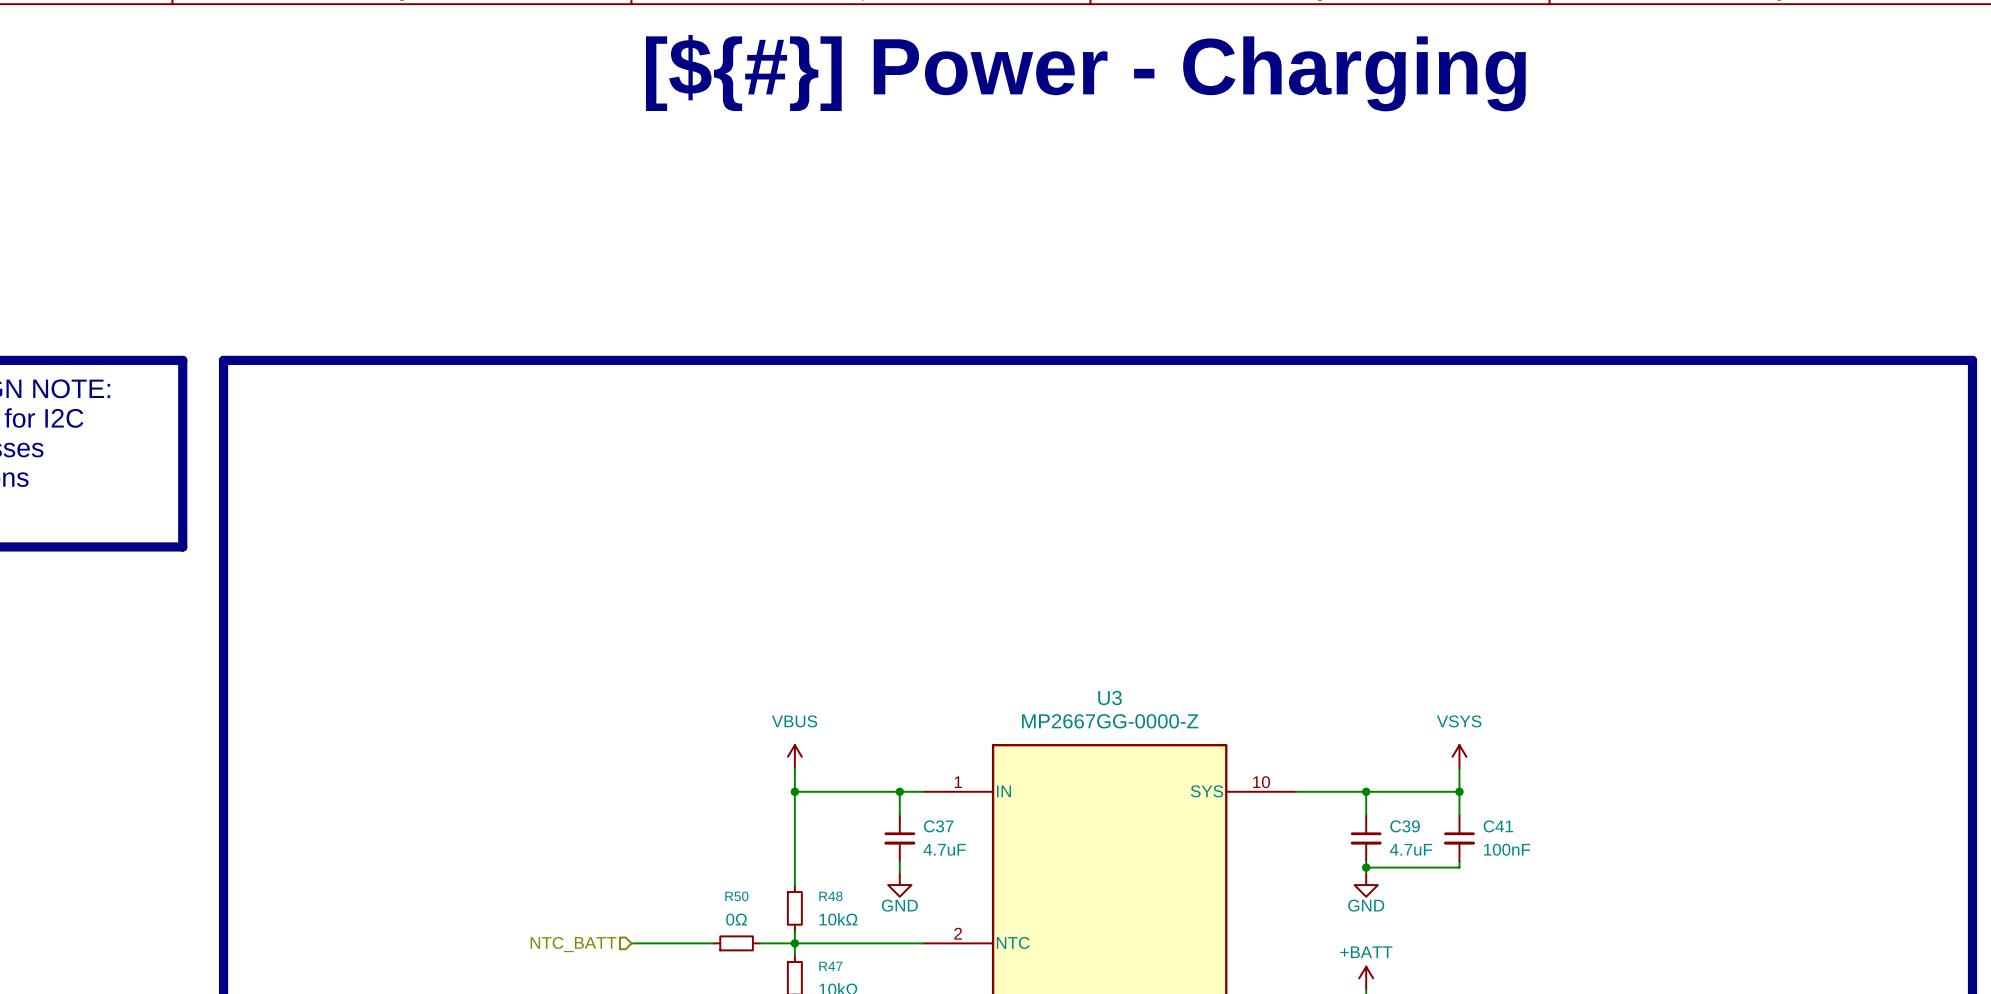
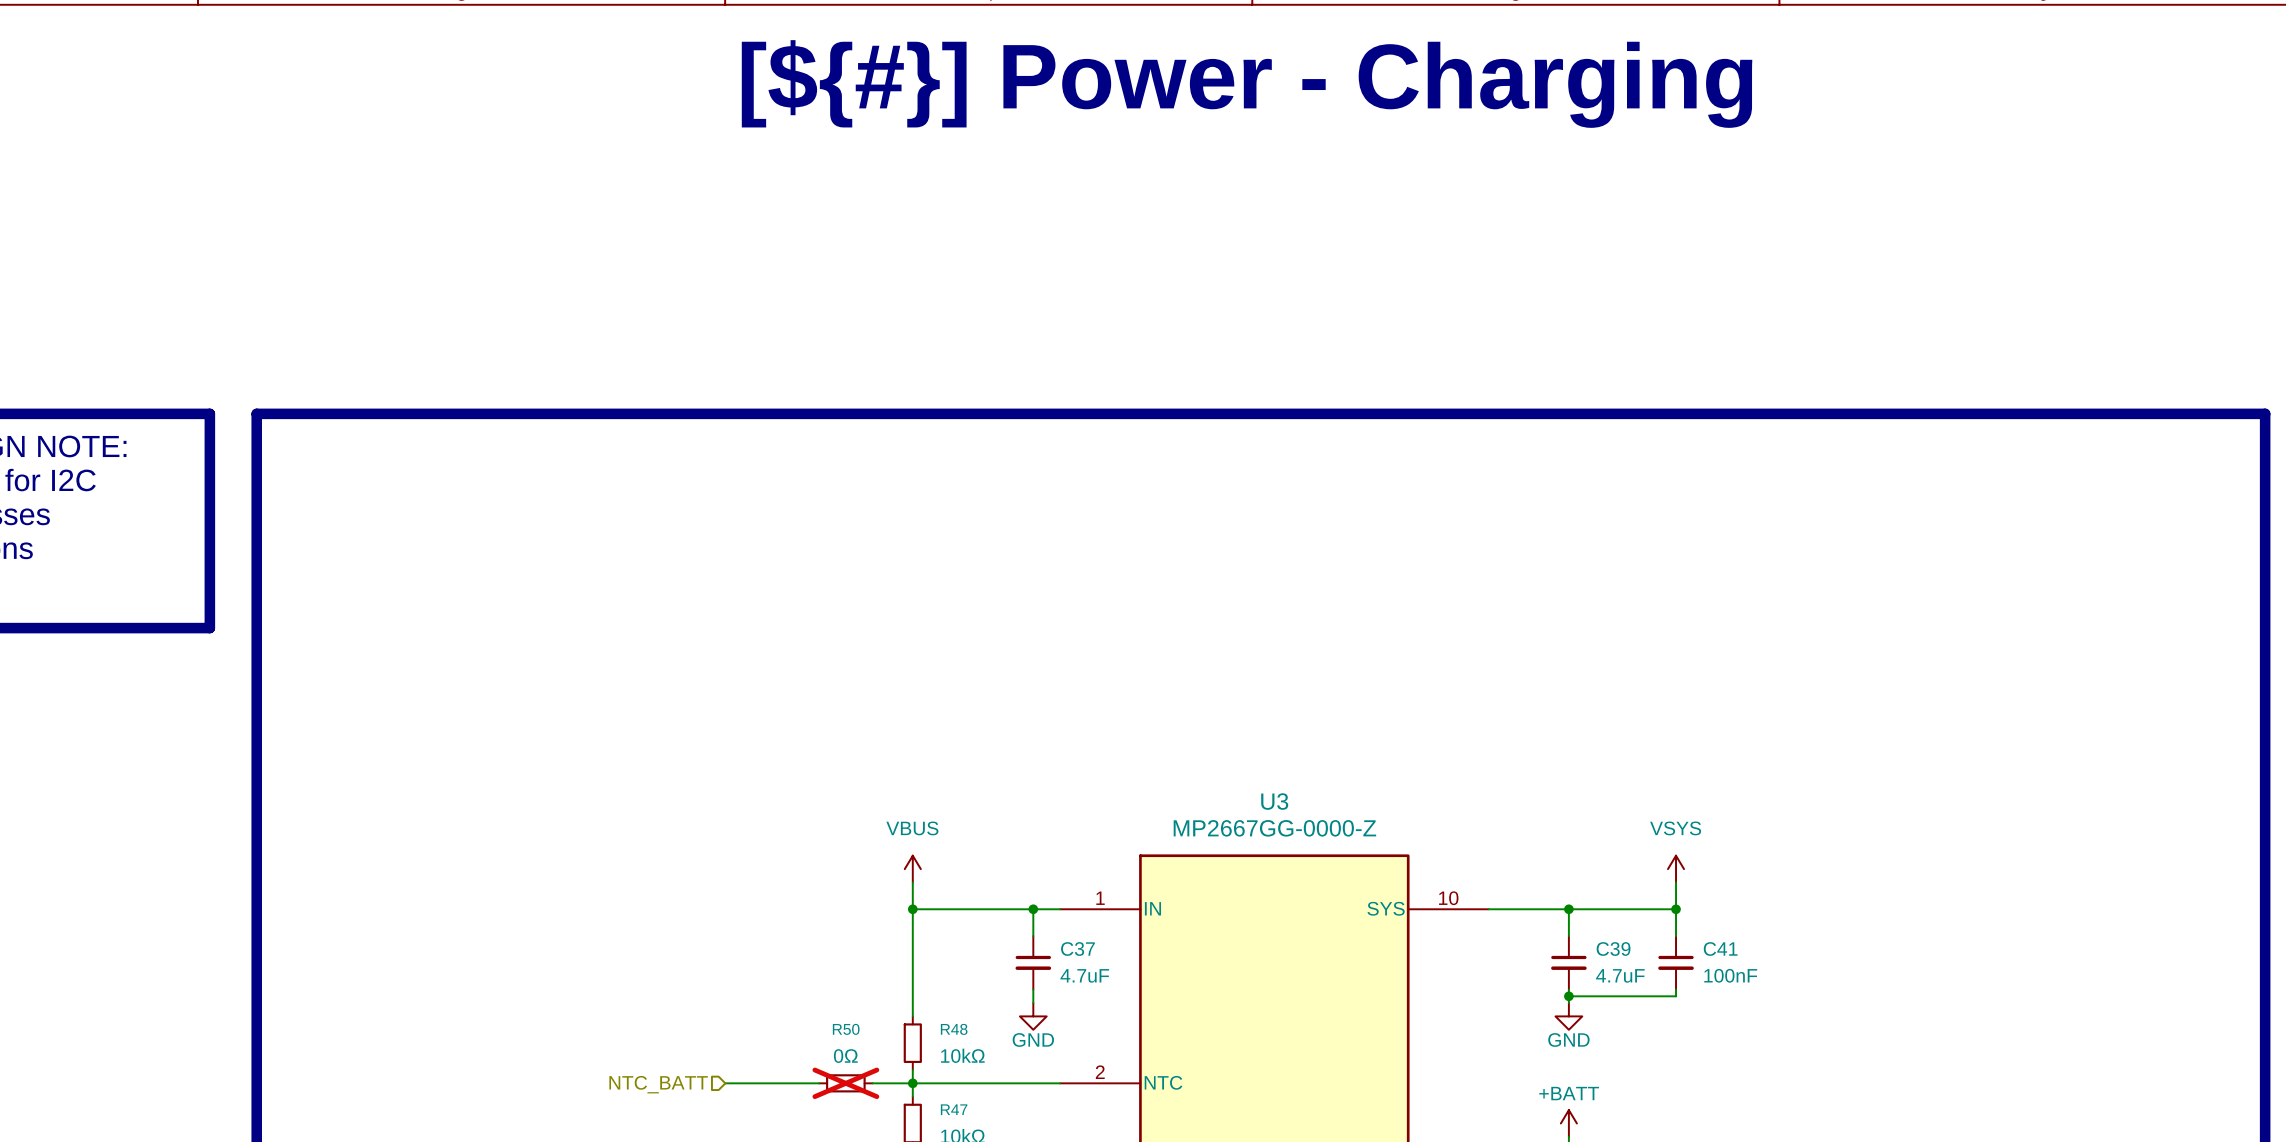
R50 do-not-place cross: none -> (845, 1083)

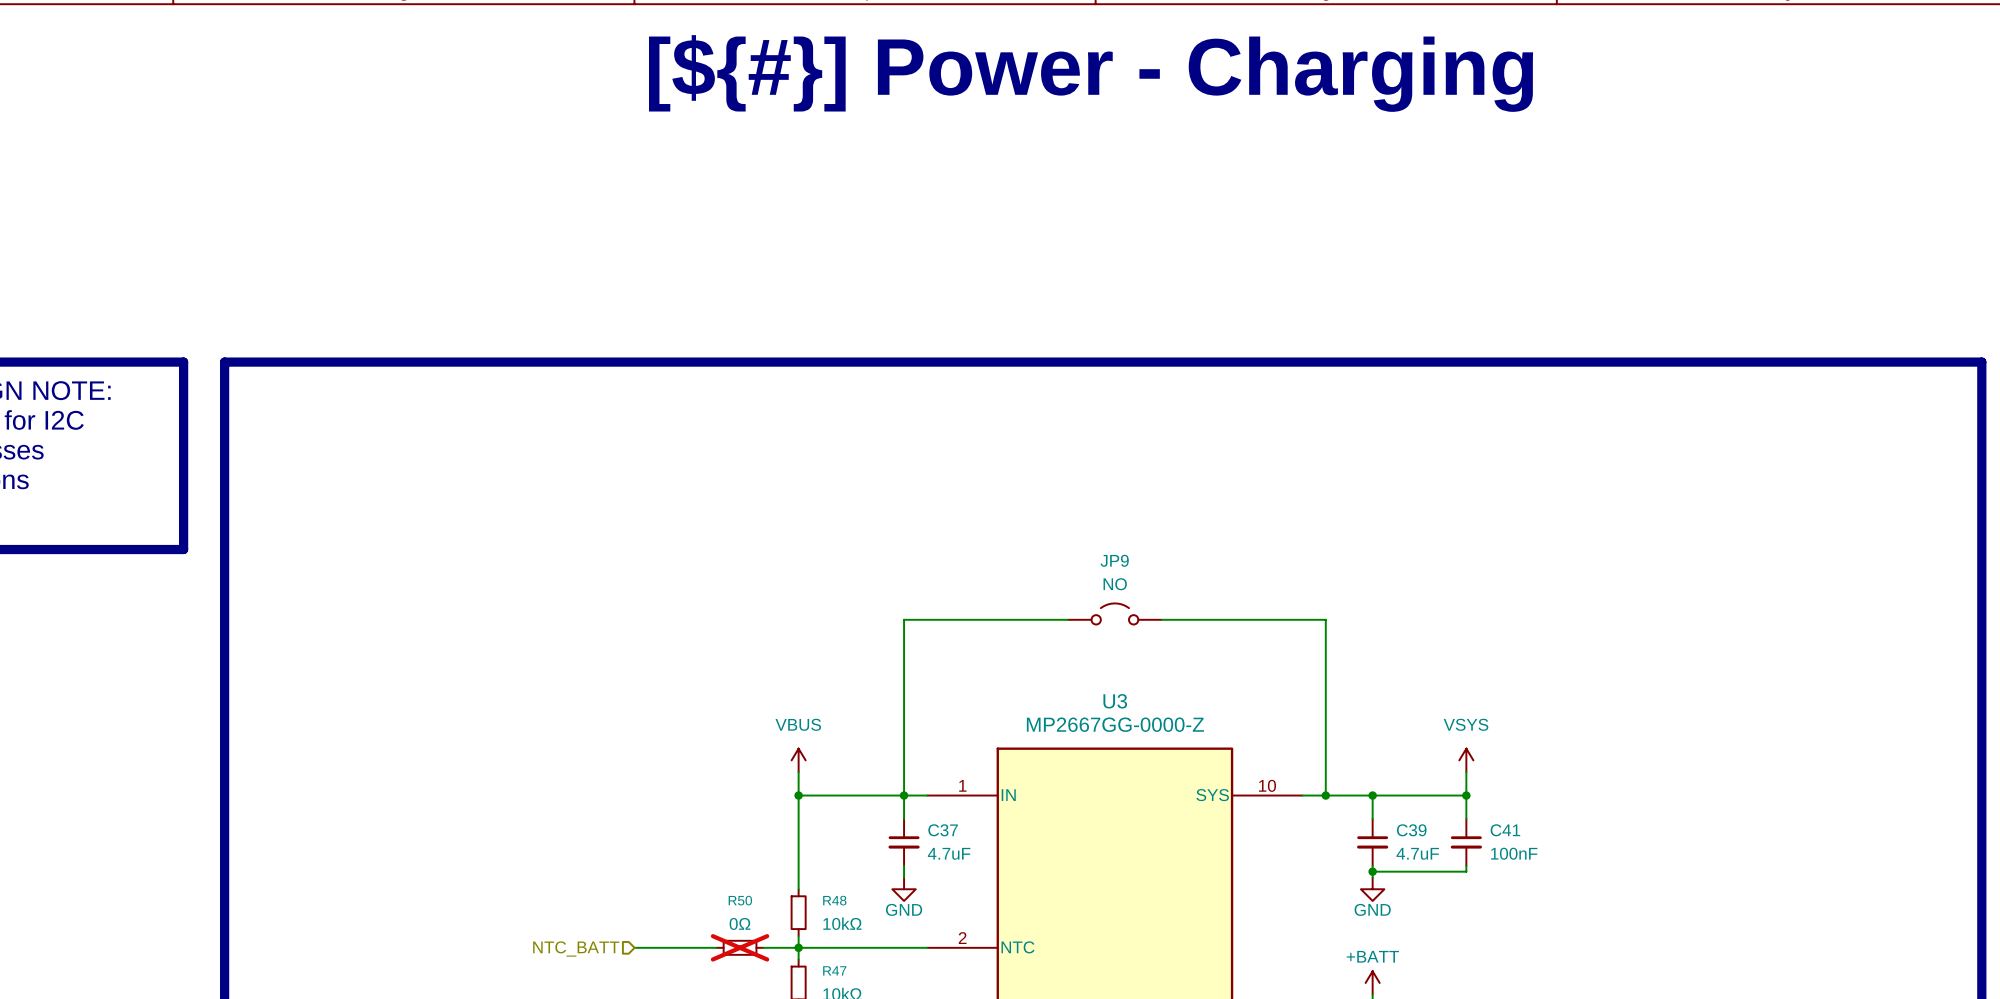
JP9: none -> NO (1114, 613)
wire: none -> (1068, 619) (904, 619) (904, 795)
wire: none -> (1161, 619) (1325, 619) (1325, 795)
junction: none -> (1325, 795)

